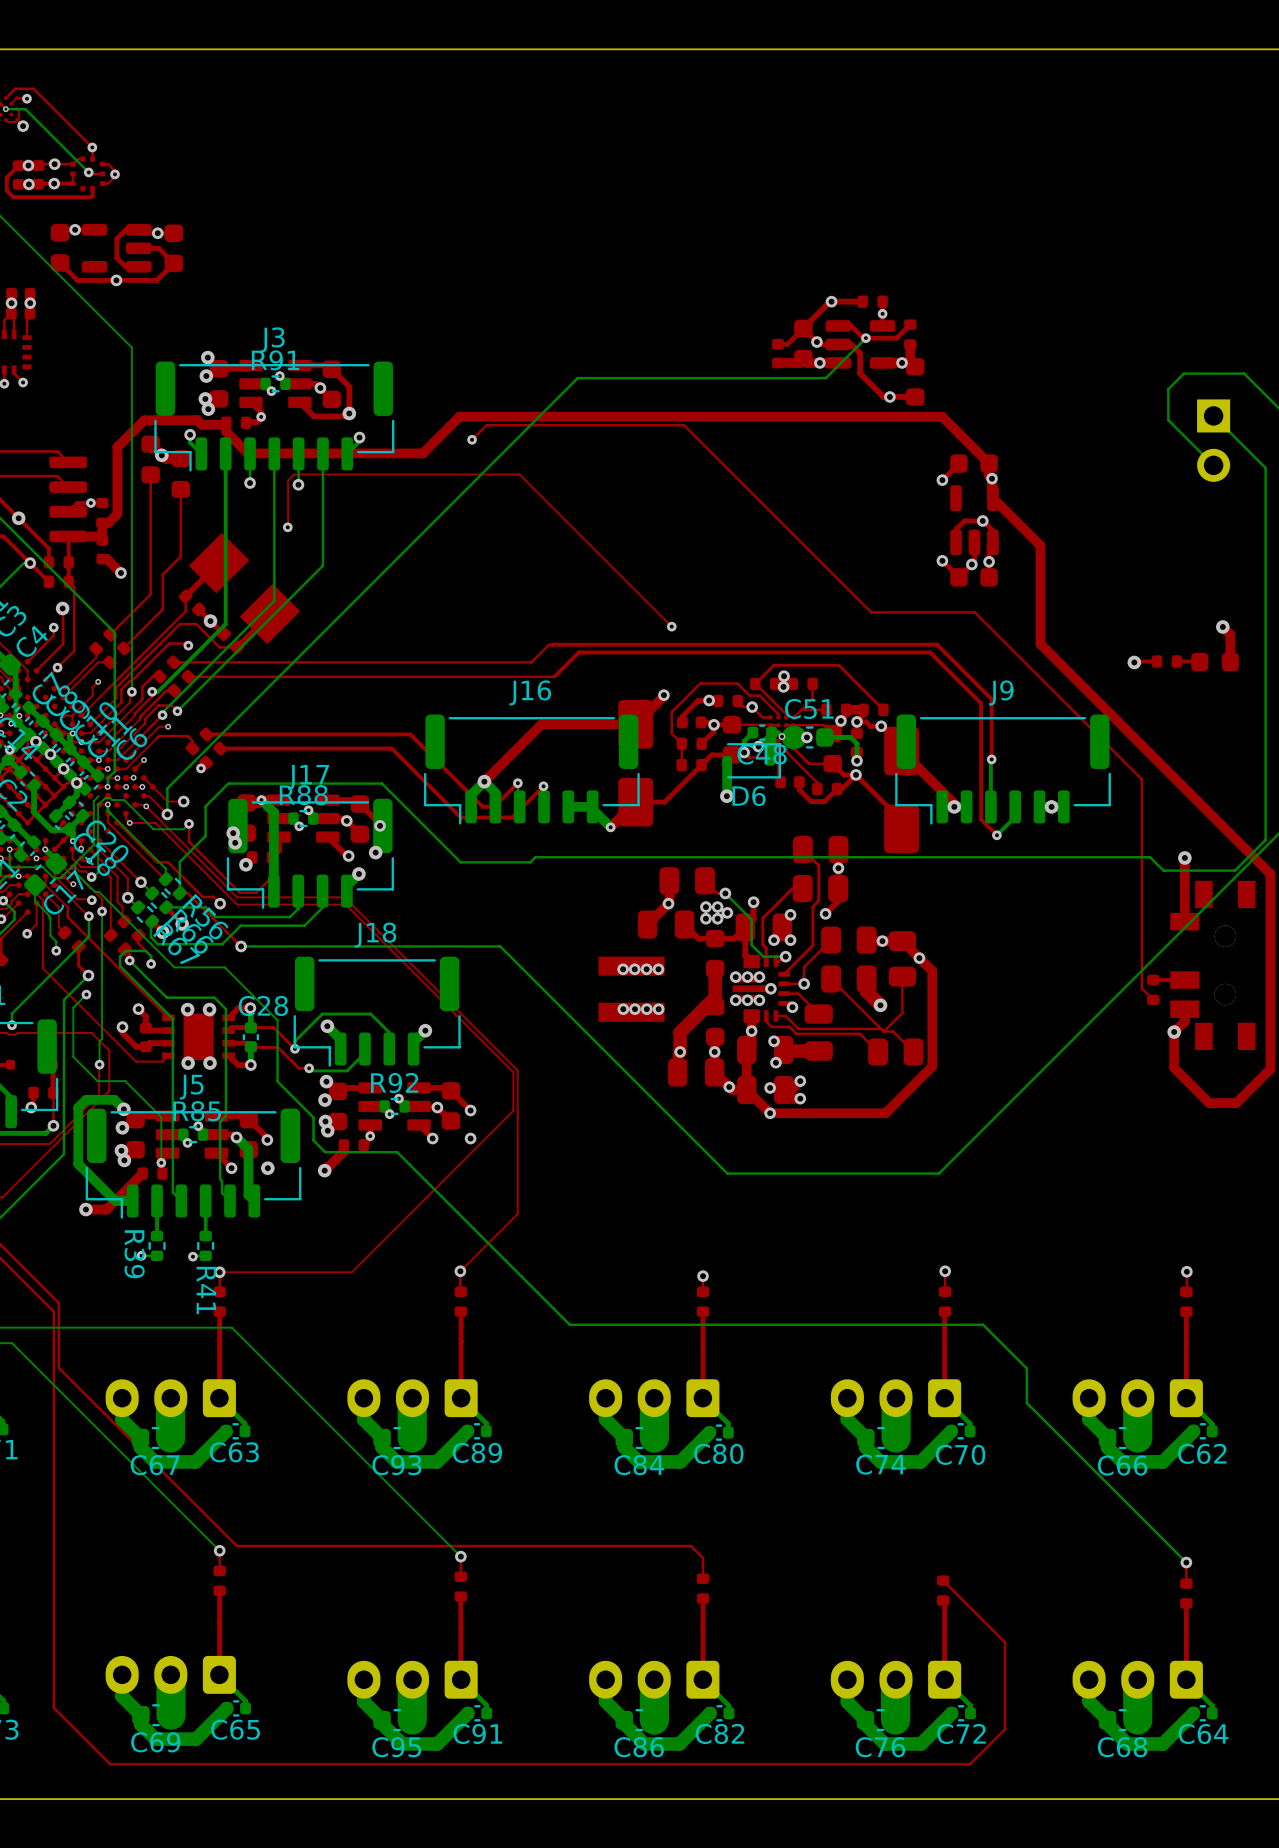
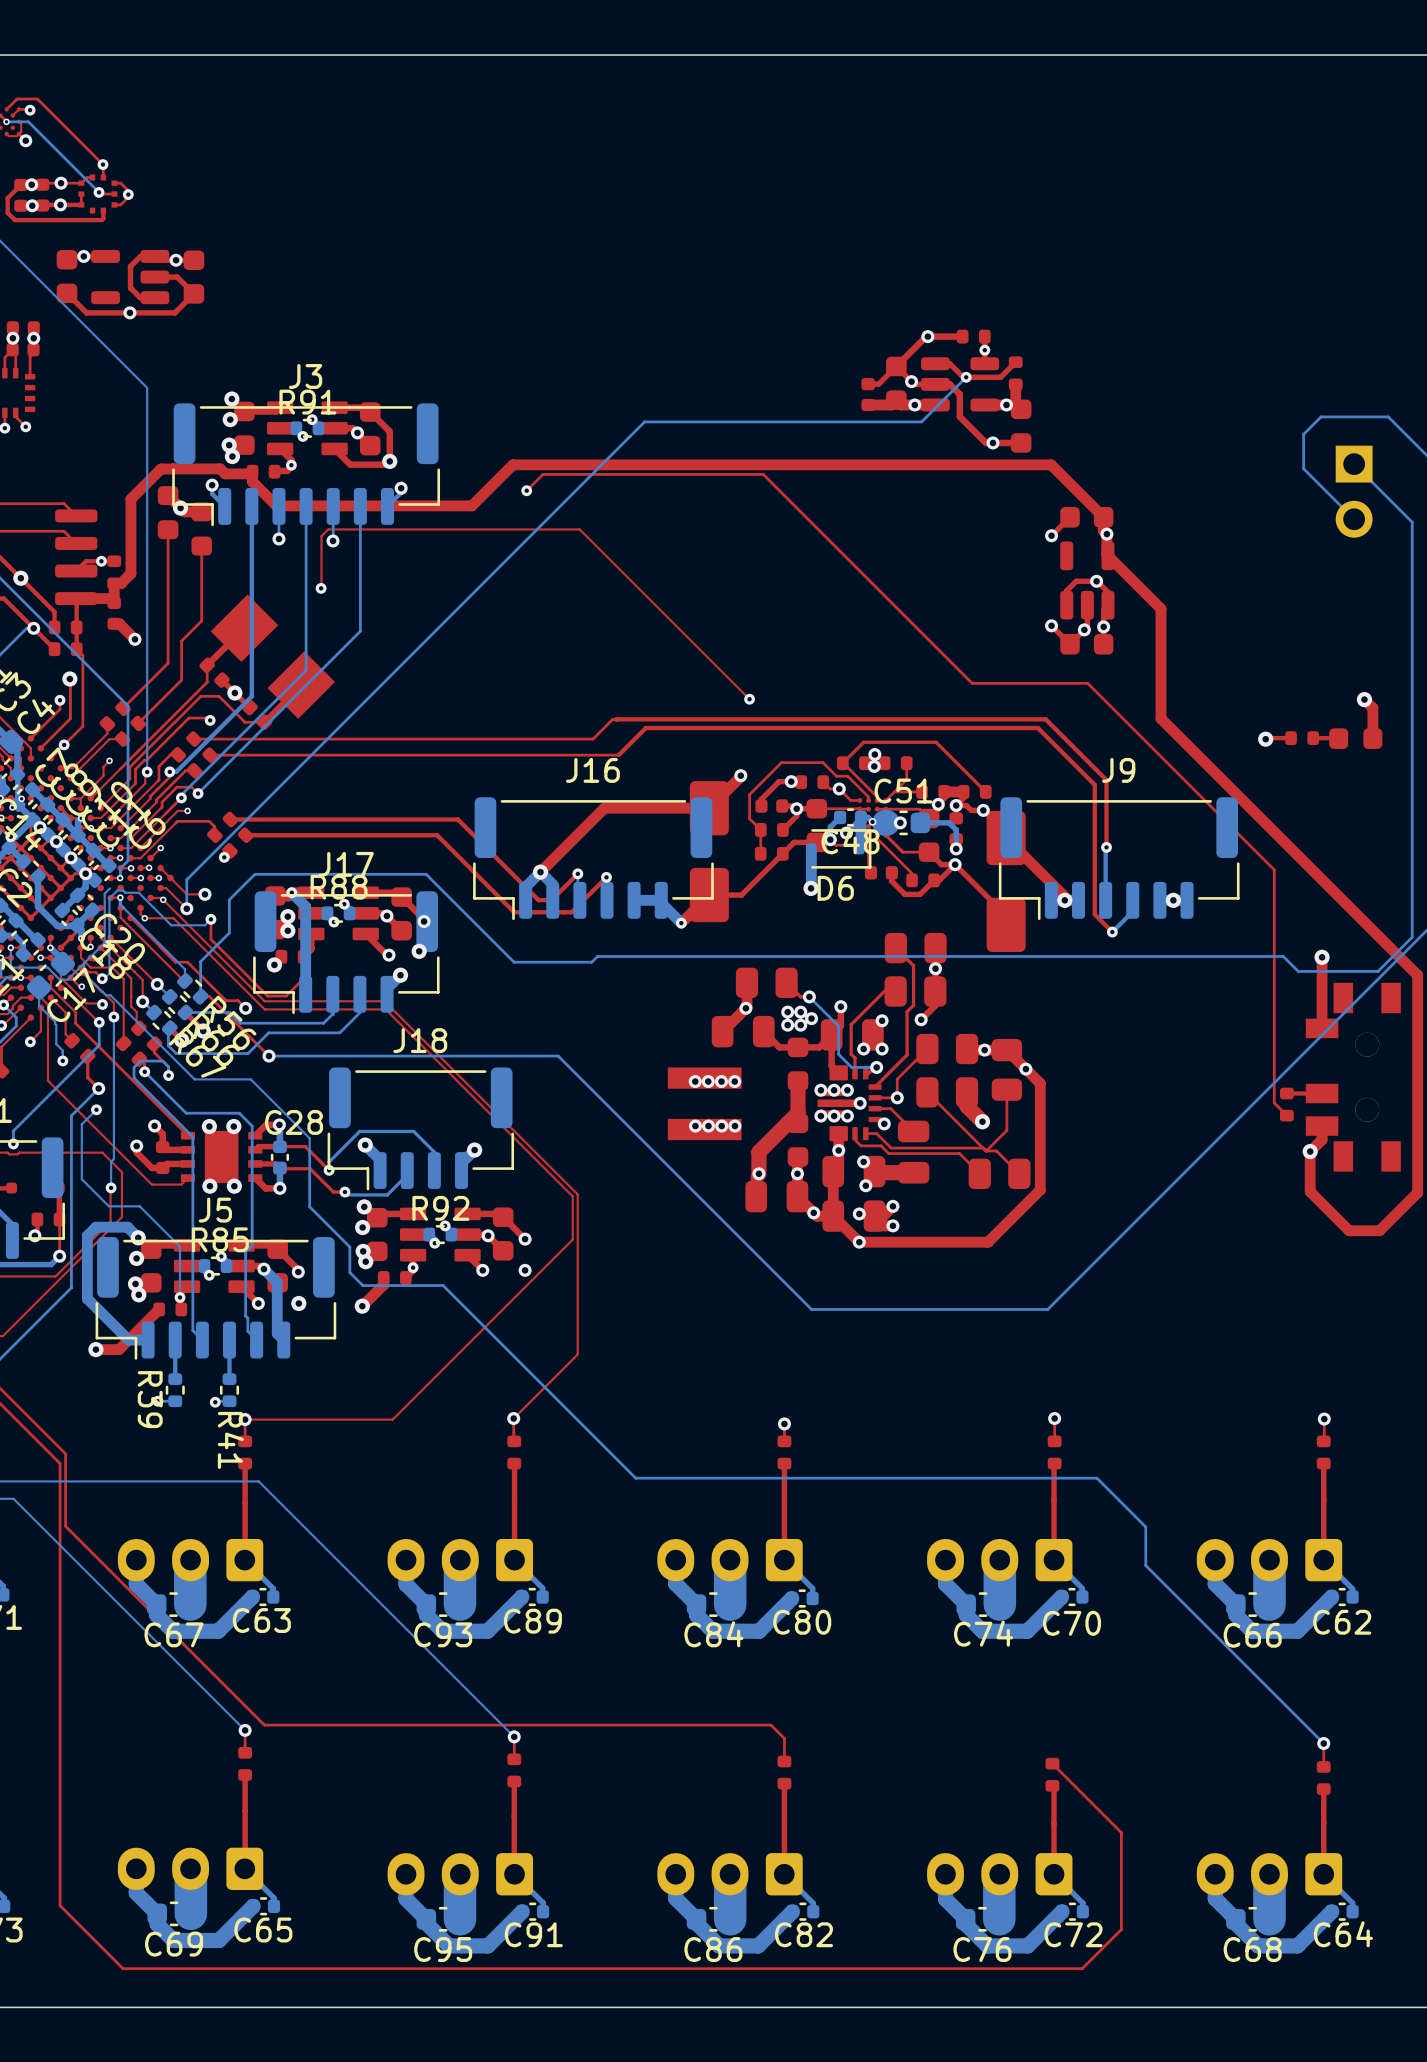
via: none -> (287, 916)
via: (233, 833) -> none
via: none -> (287, 930)
via: (235, 842) -> none

